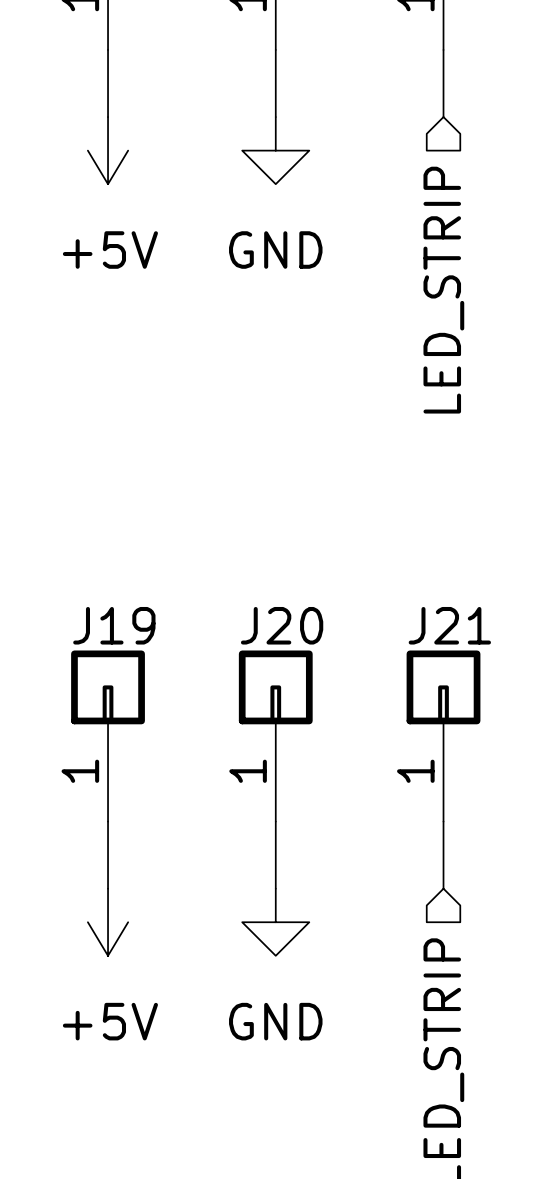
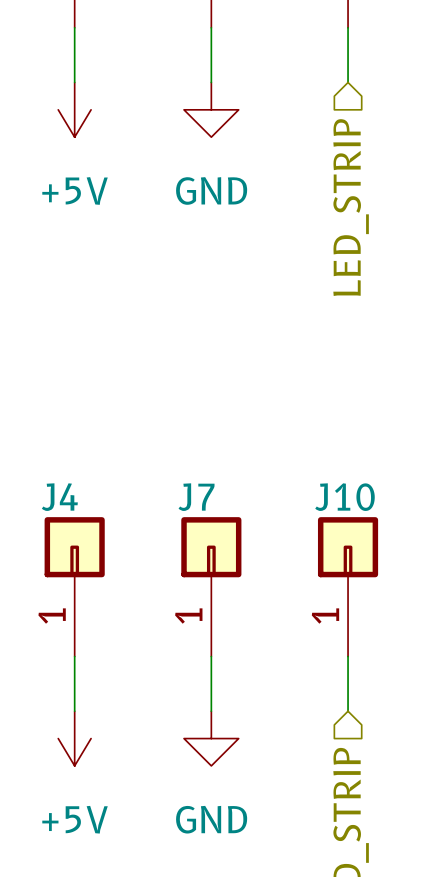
J19 name: J19 (114, 625) -> J4 (59, 497)
J20 name: J20 (282, 625) -> J7 (196, 497)
J21 name: J21 (449, 625) -> J10 (344, 497)

